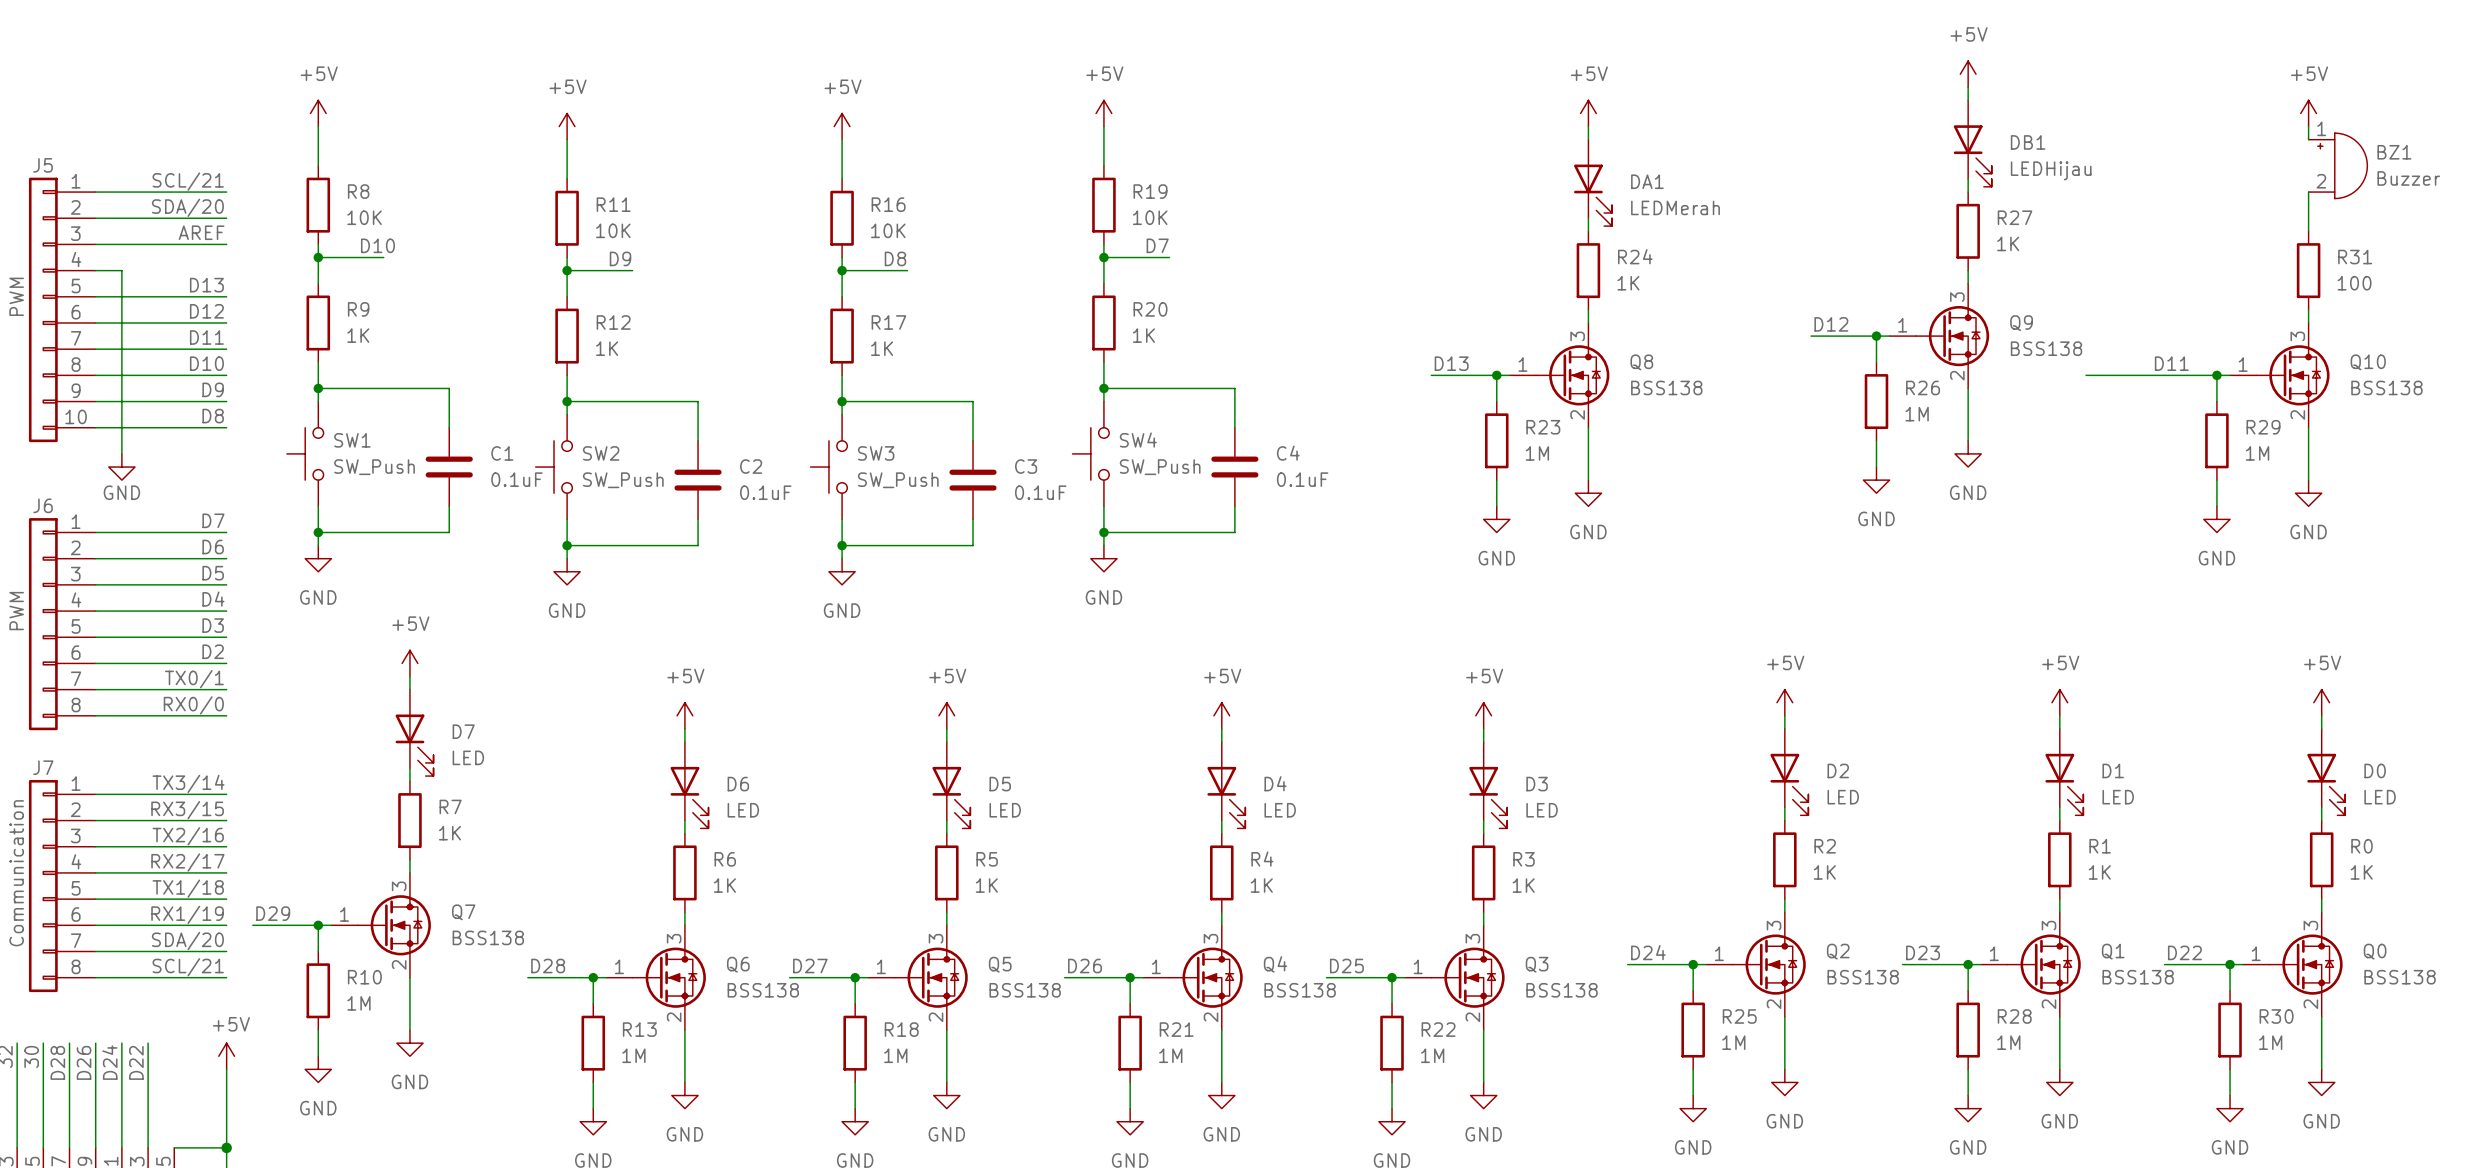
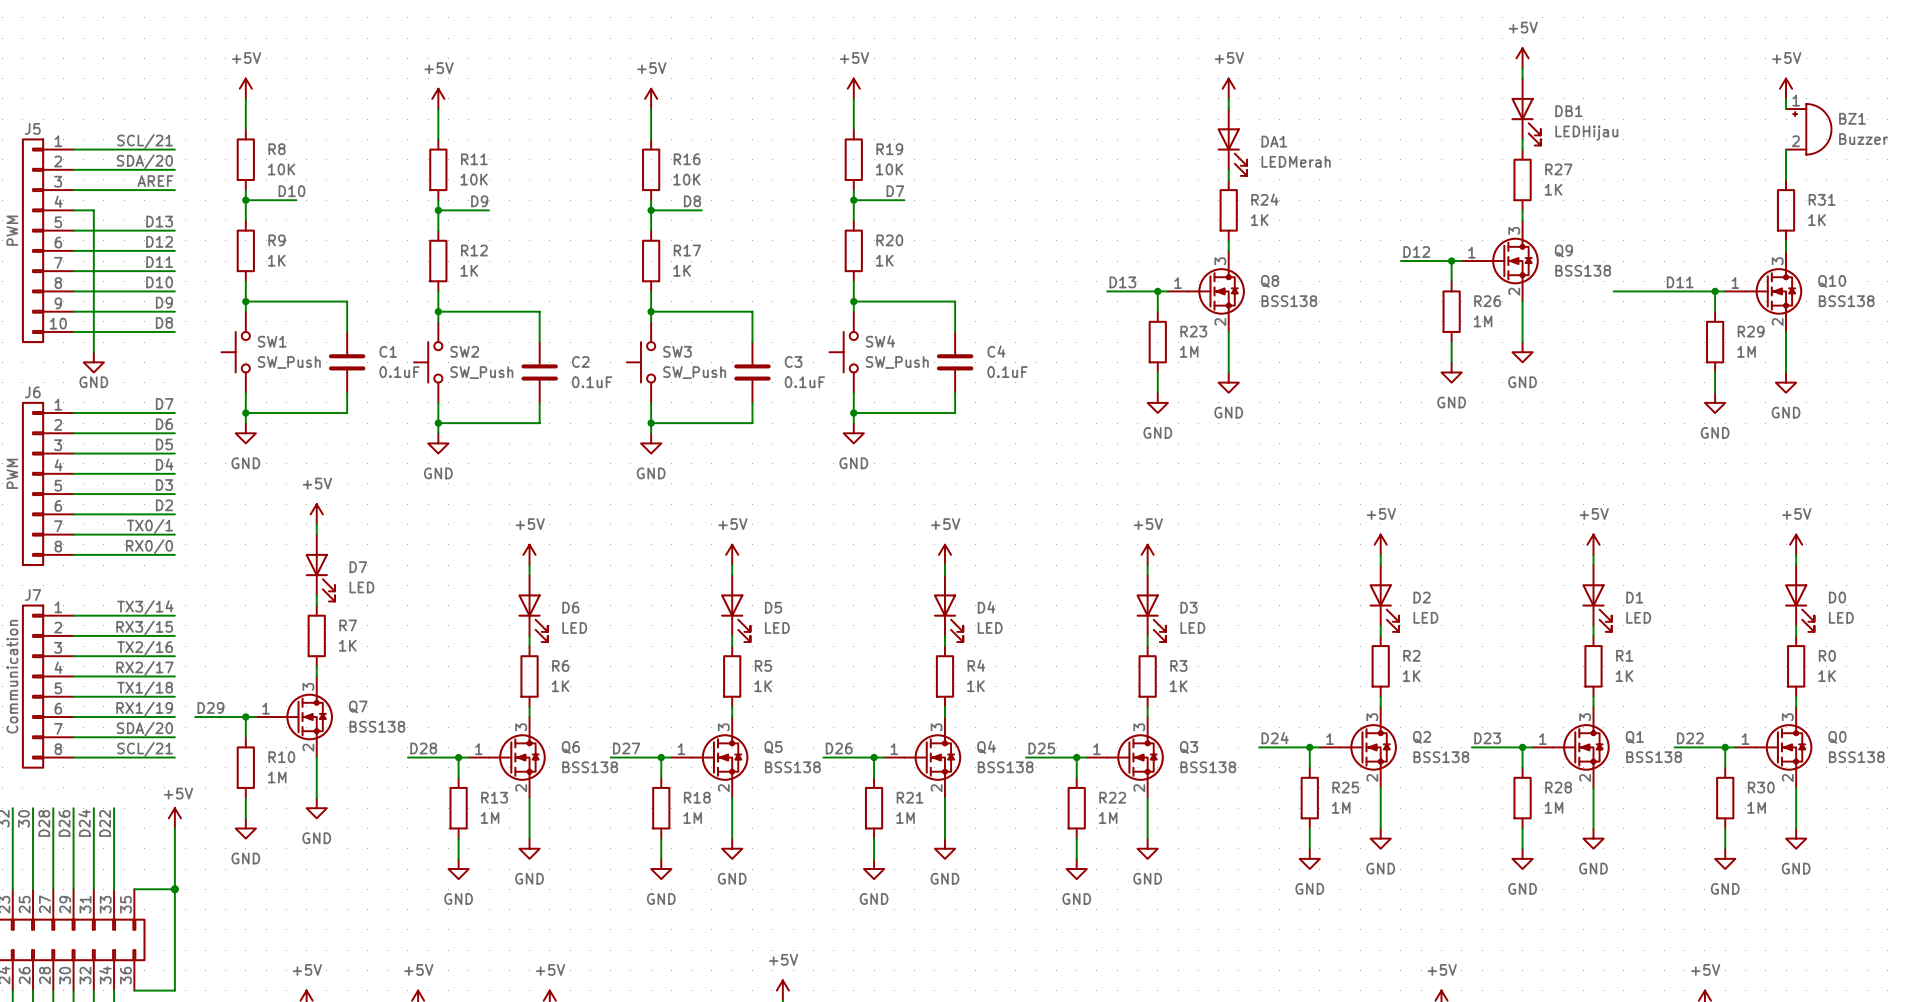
R31 value: 100 (2354, 283) -> 1K (1816, 220)

